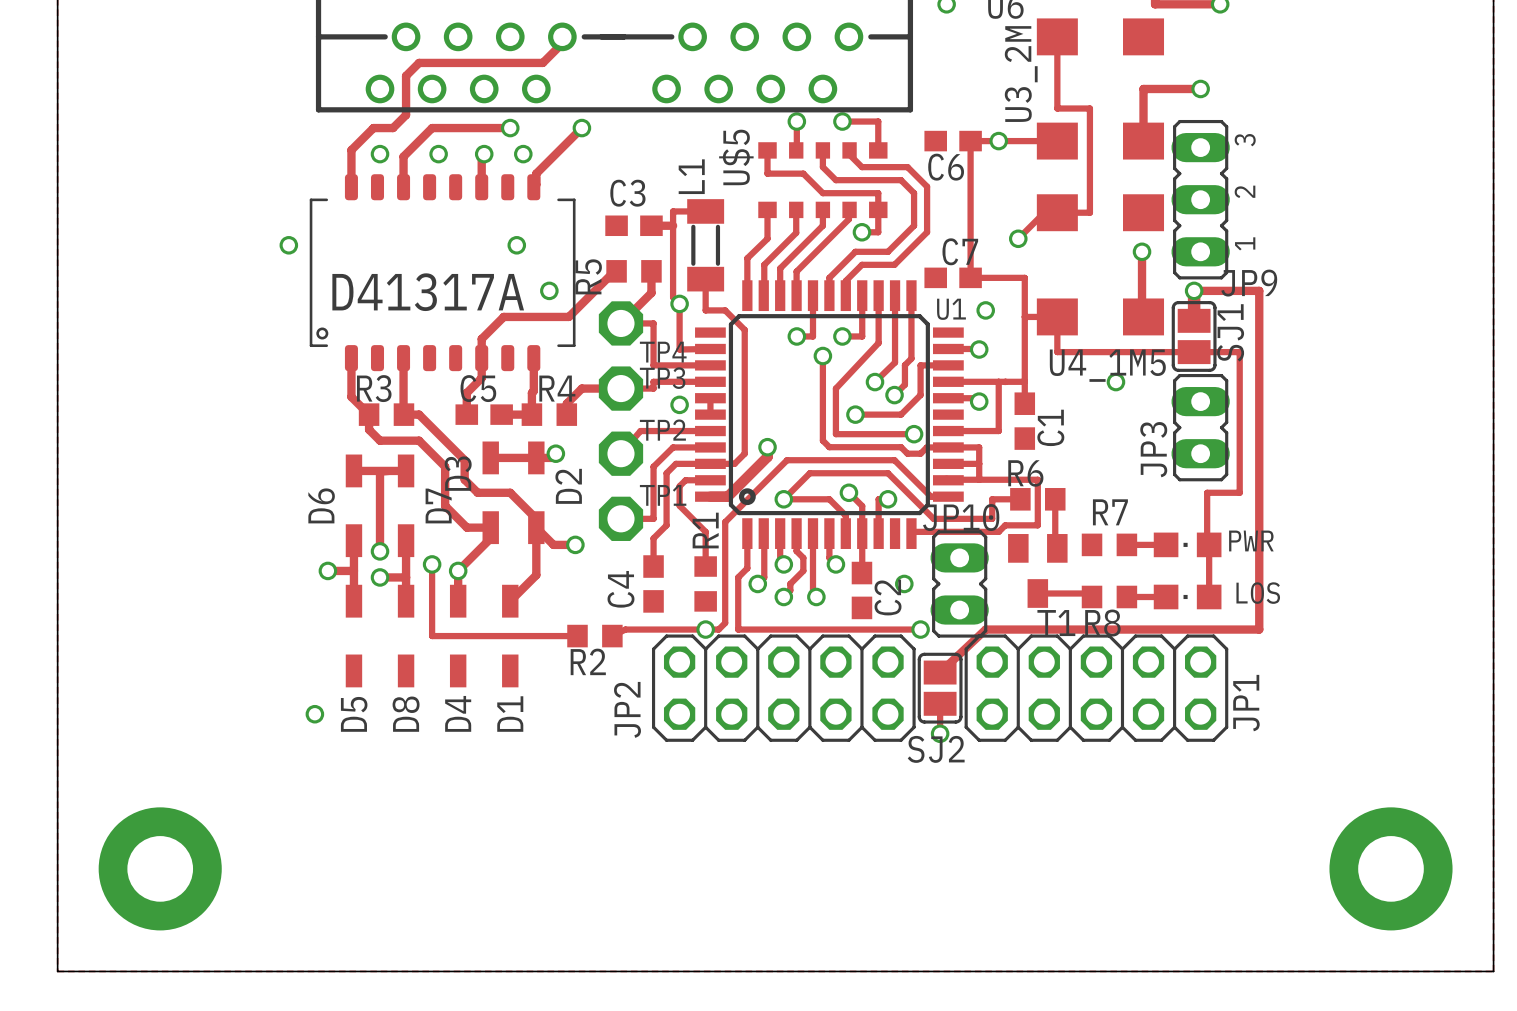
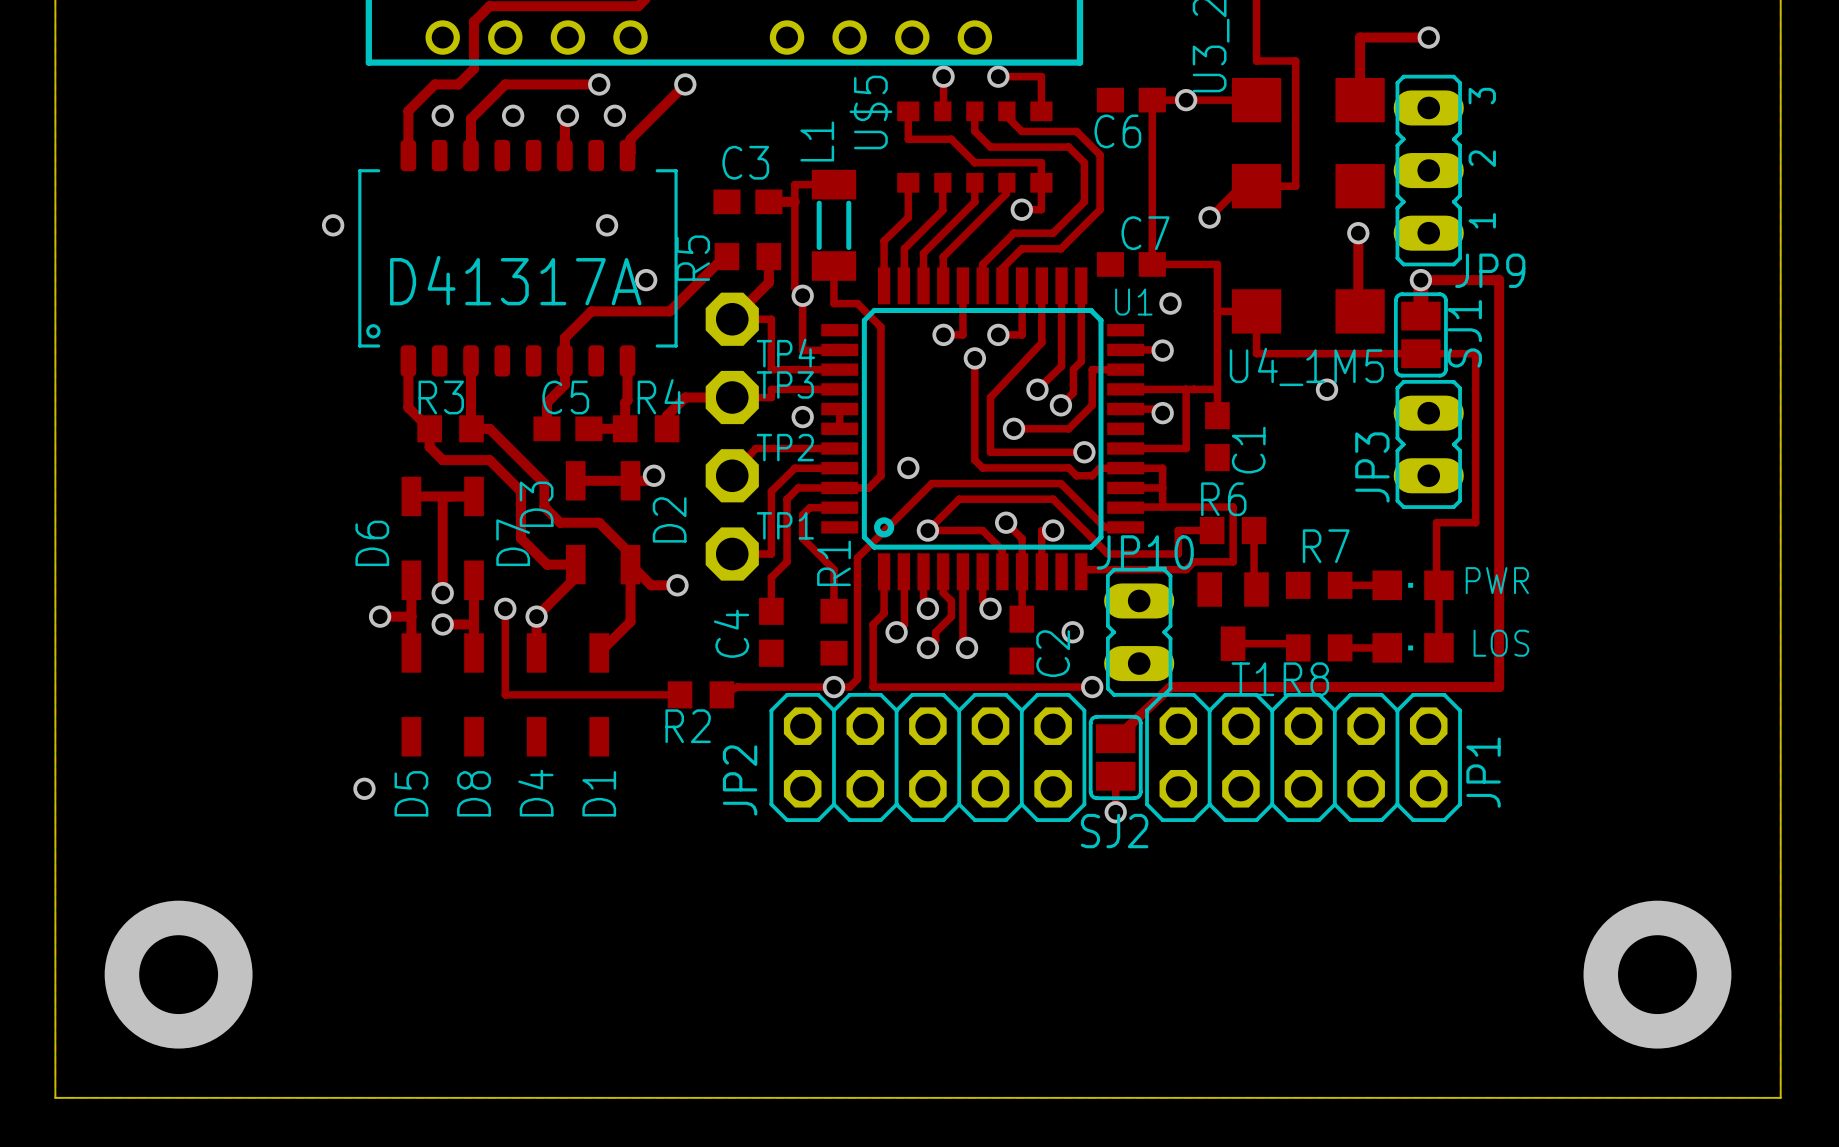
track: (767, 447) (767, 456) (727, 496) (710, 496) -> none

